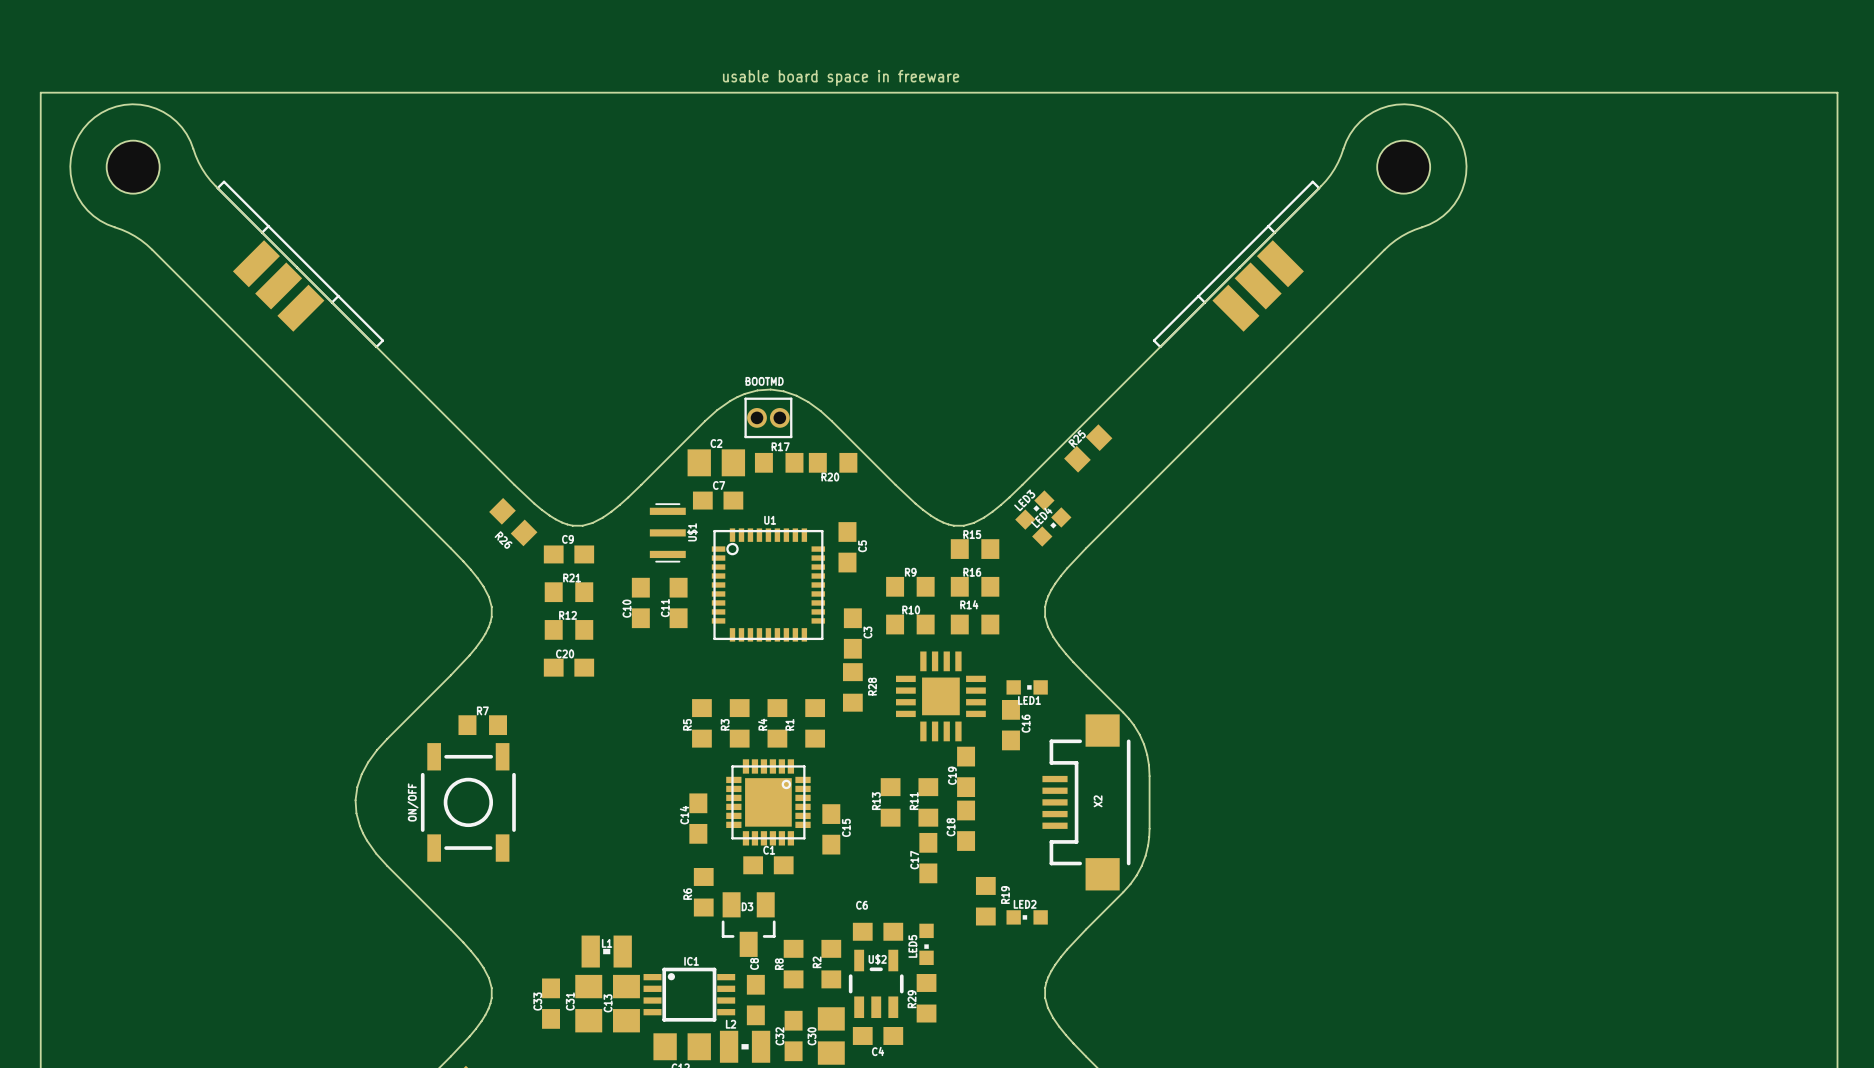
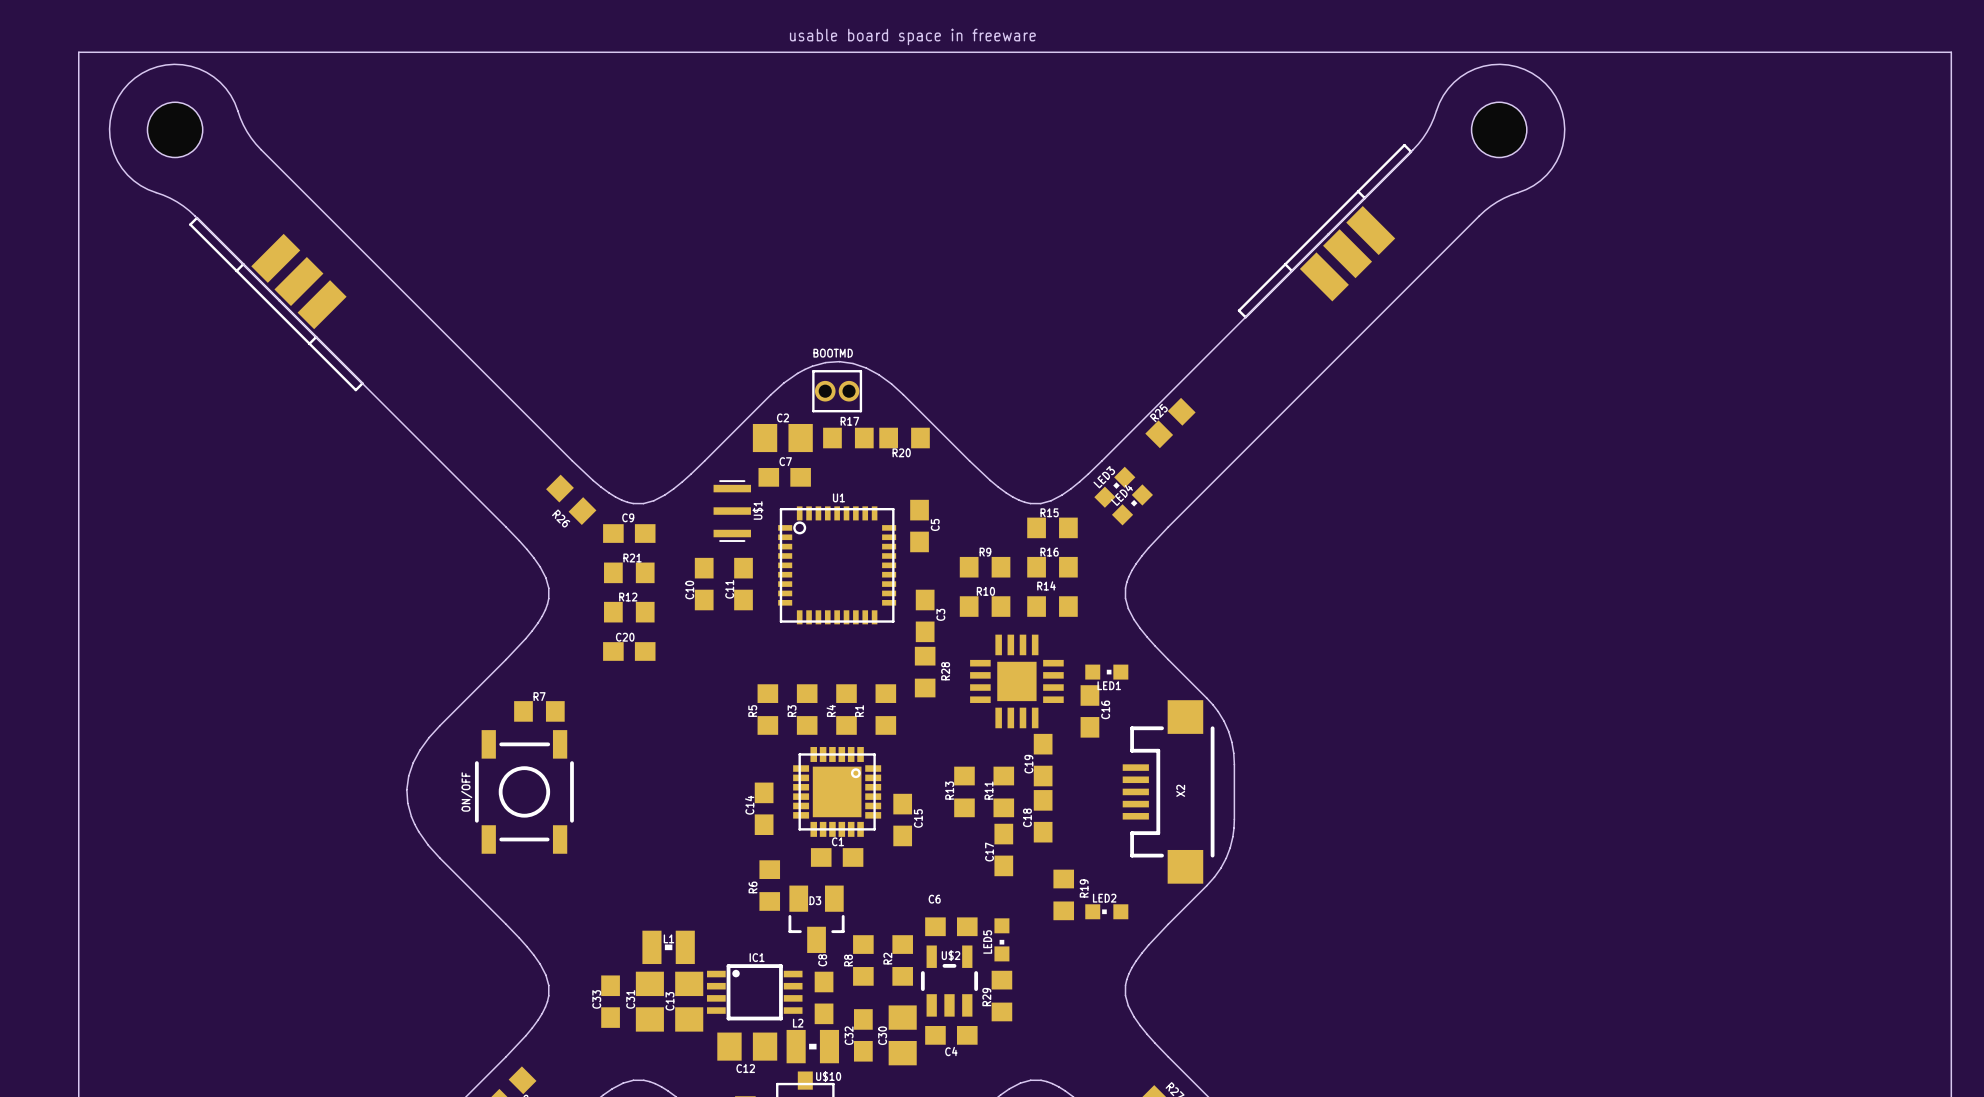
part rotation: 0° (300, 264) -> 180° (276, 304)

